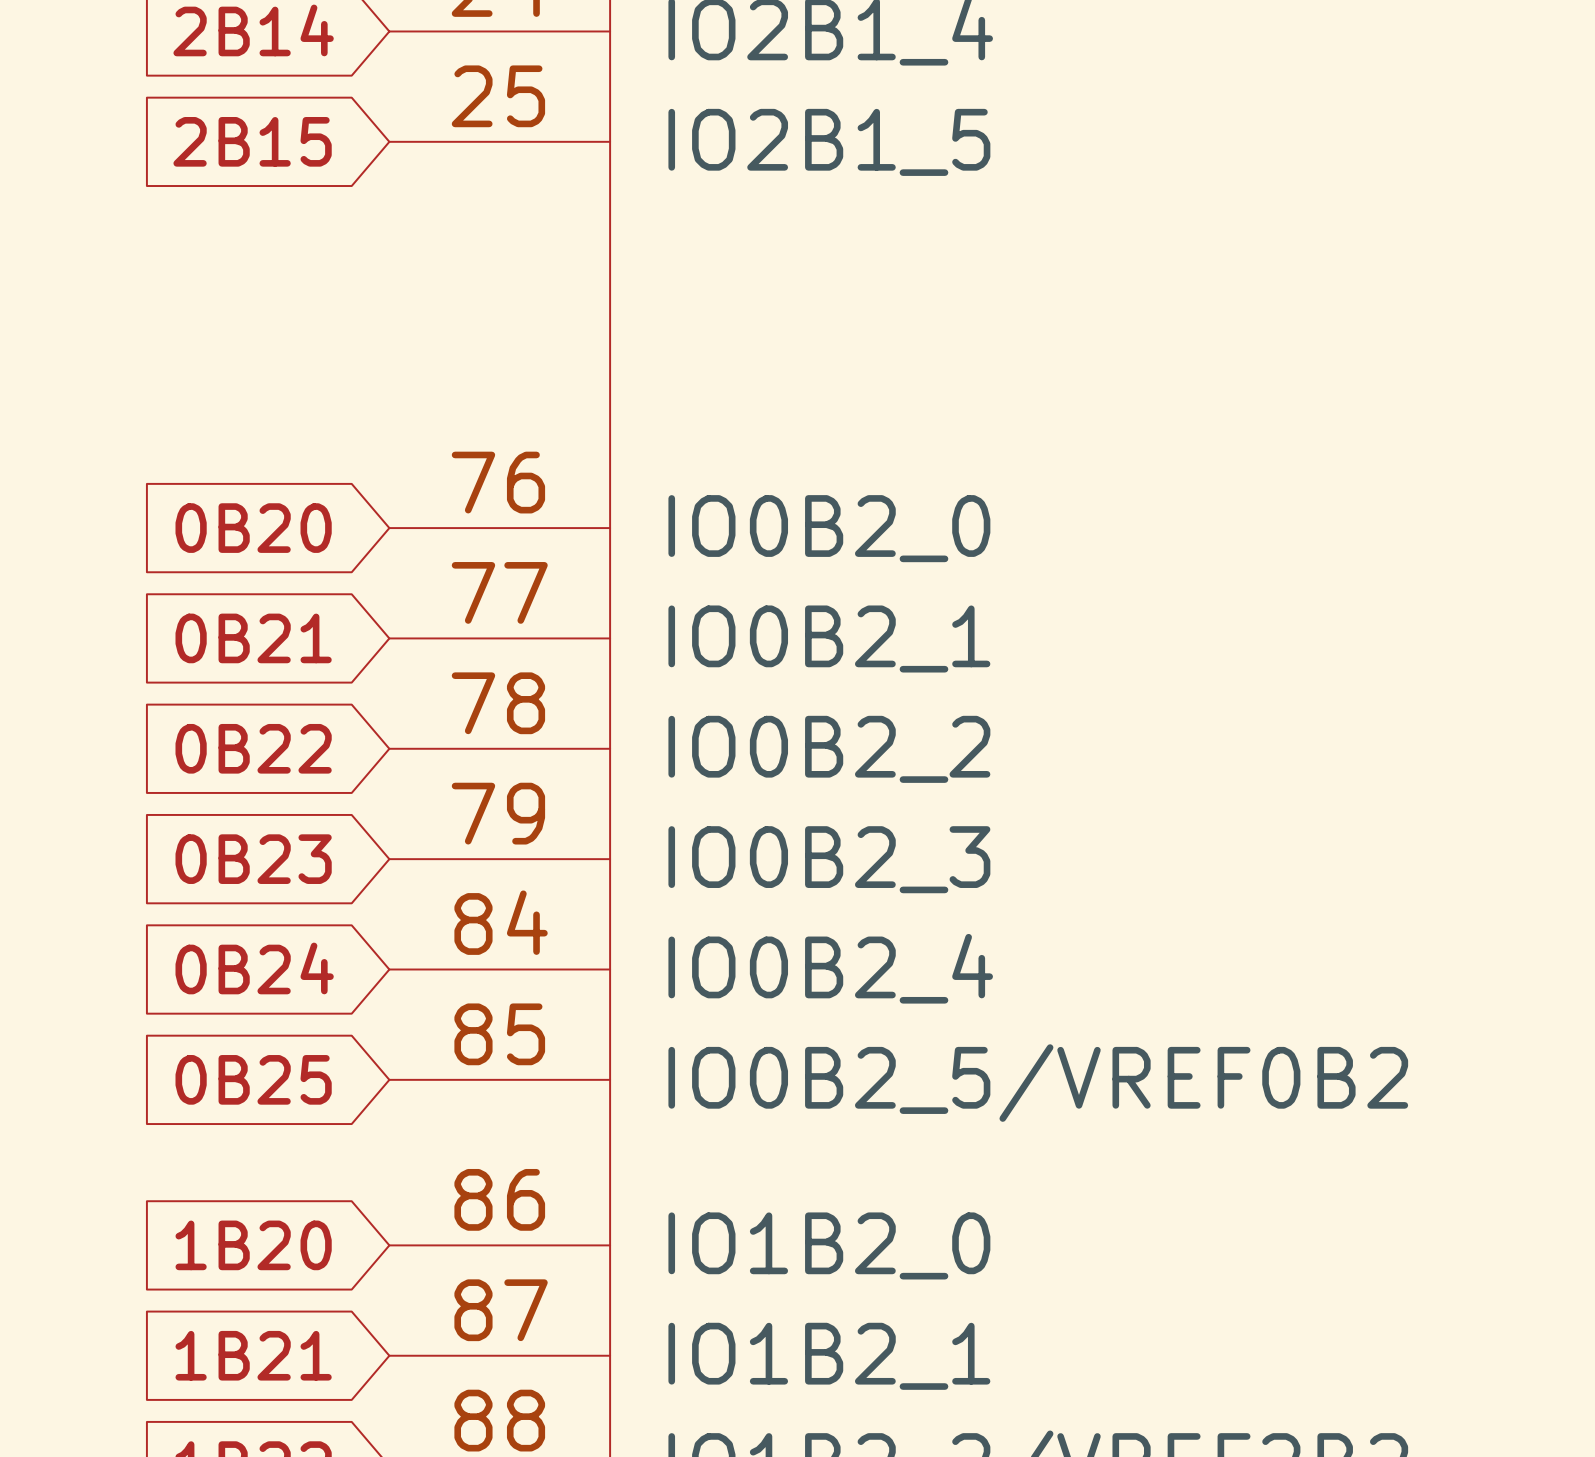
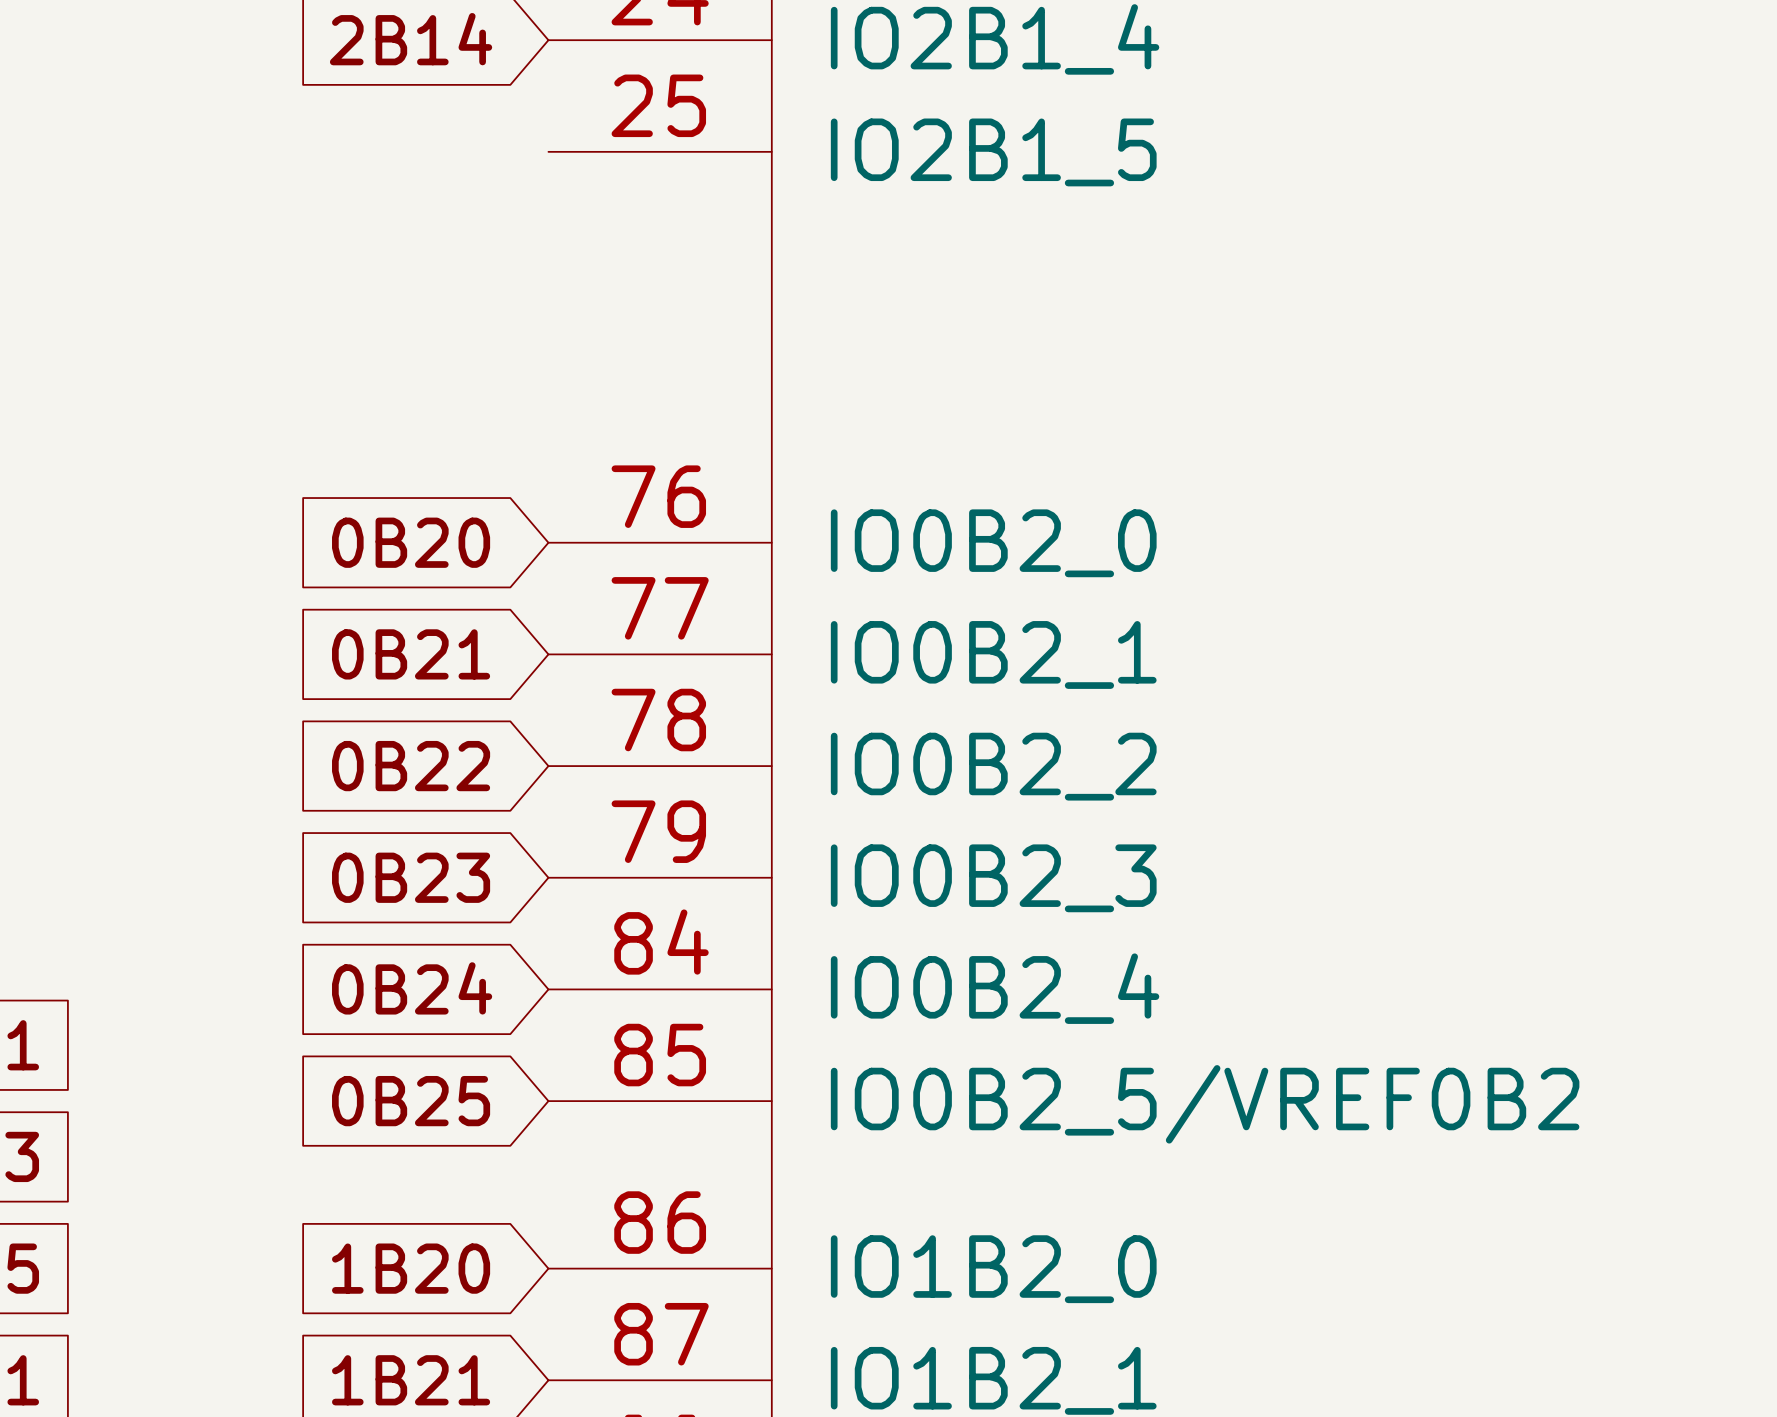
global label: 2B15 (252, 141) -> none

